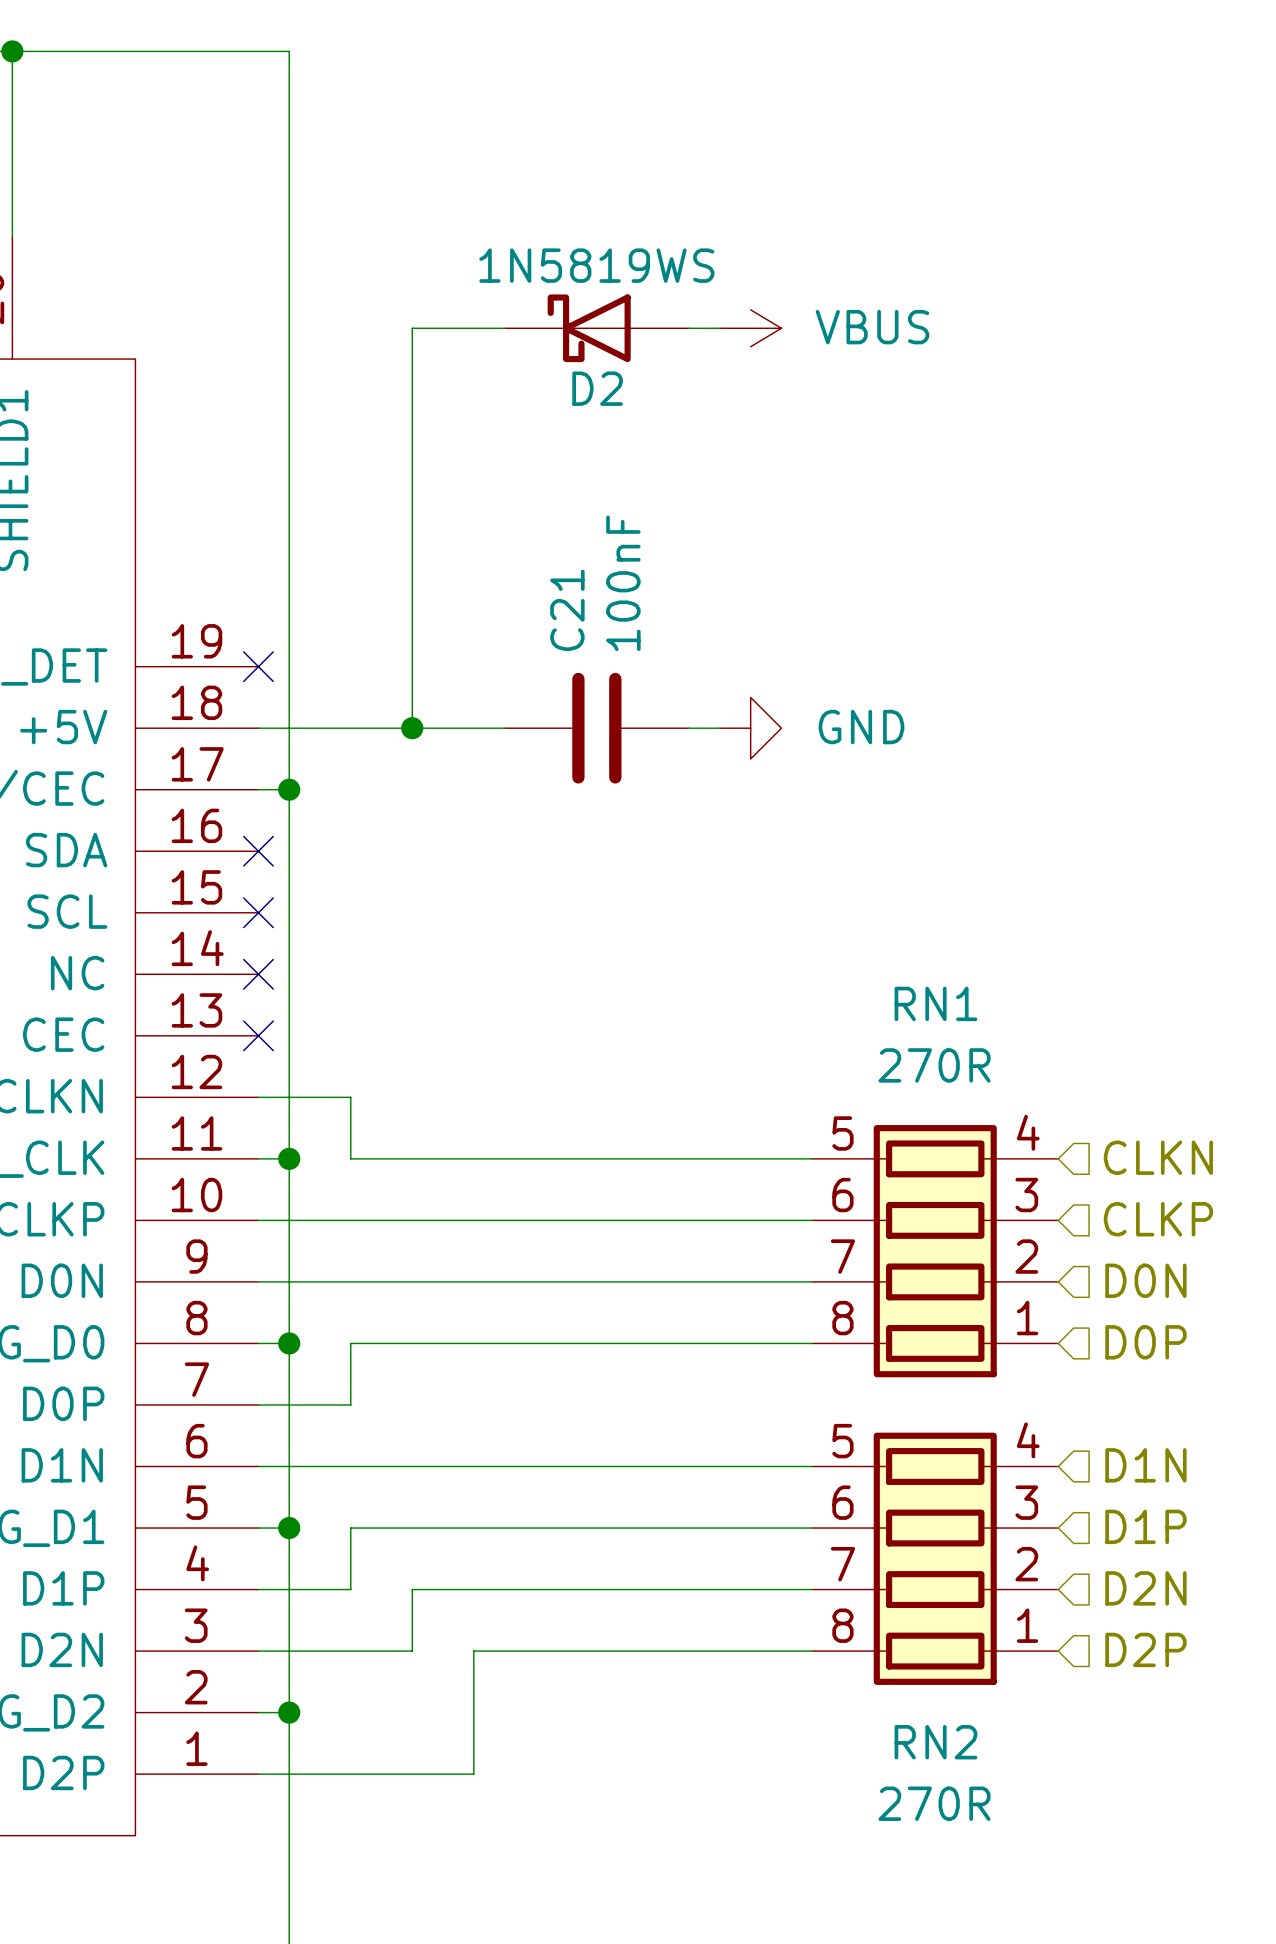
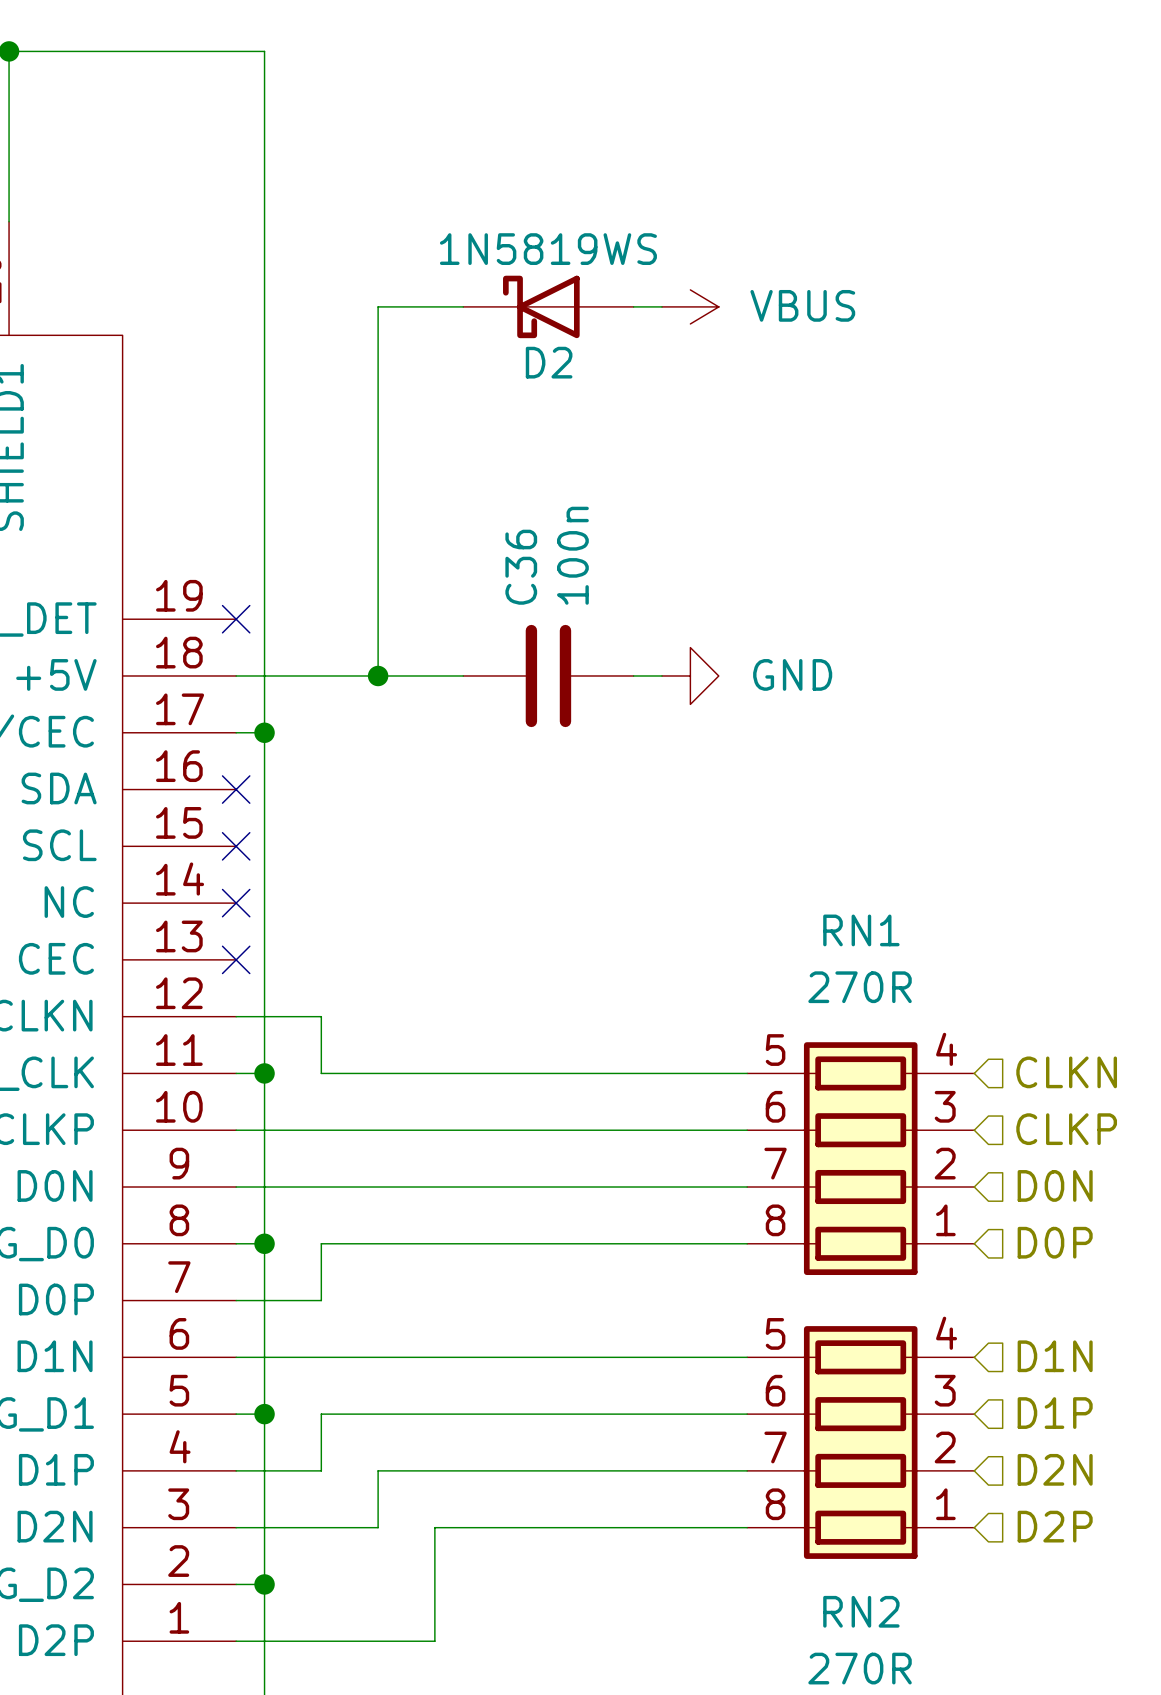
C21 value: 100nF (623, 583) -> 100n (572, 555)
C21 name: C21 (567, 610) -> C36 (521, 567)

